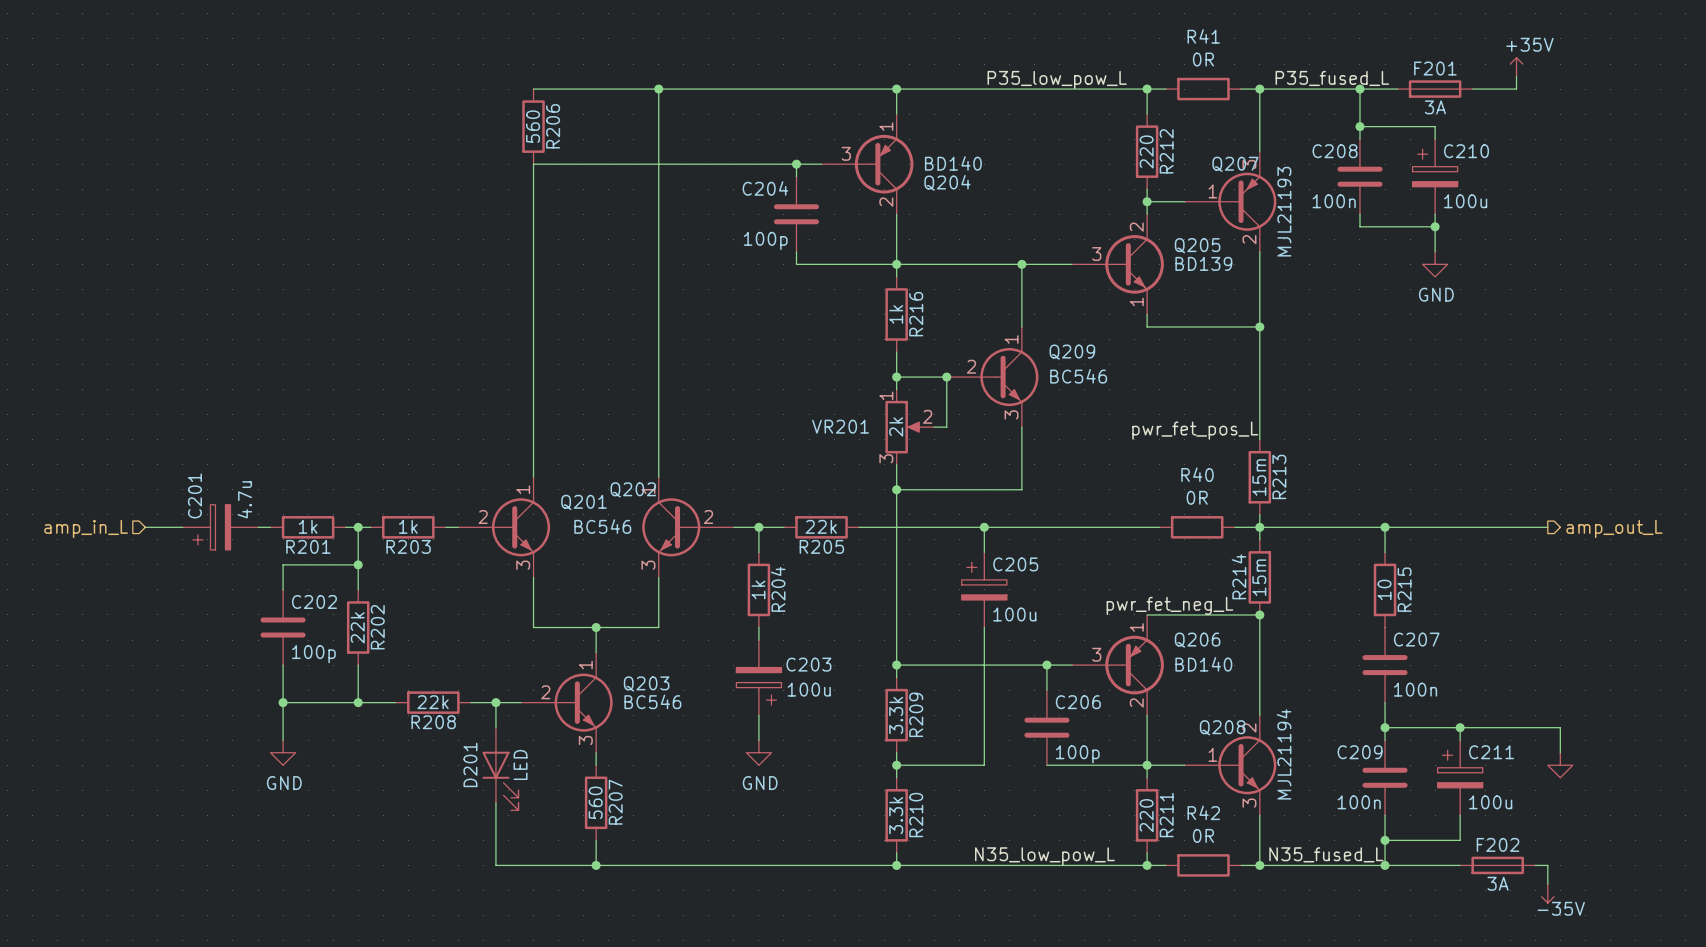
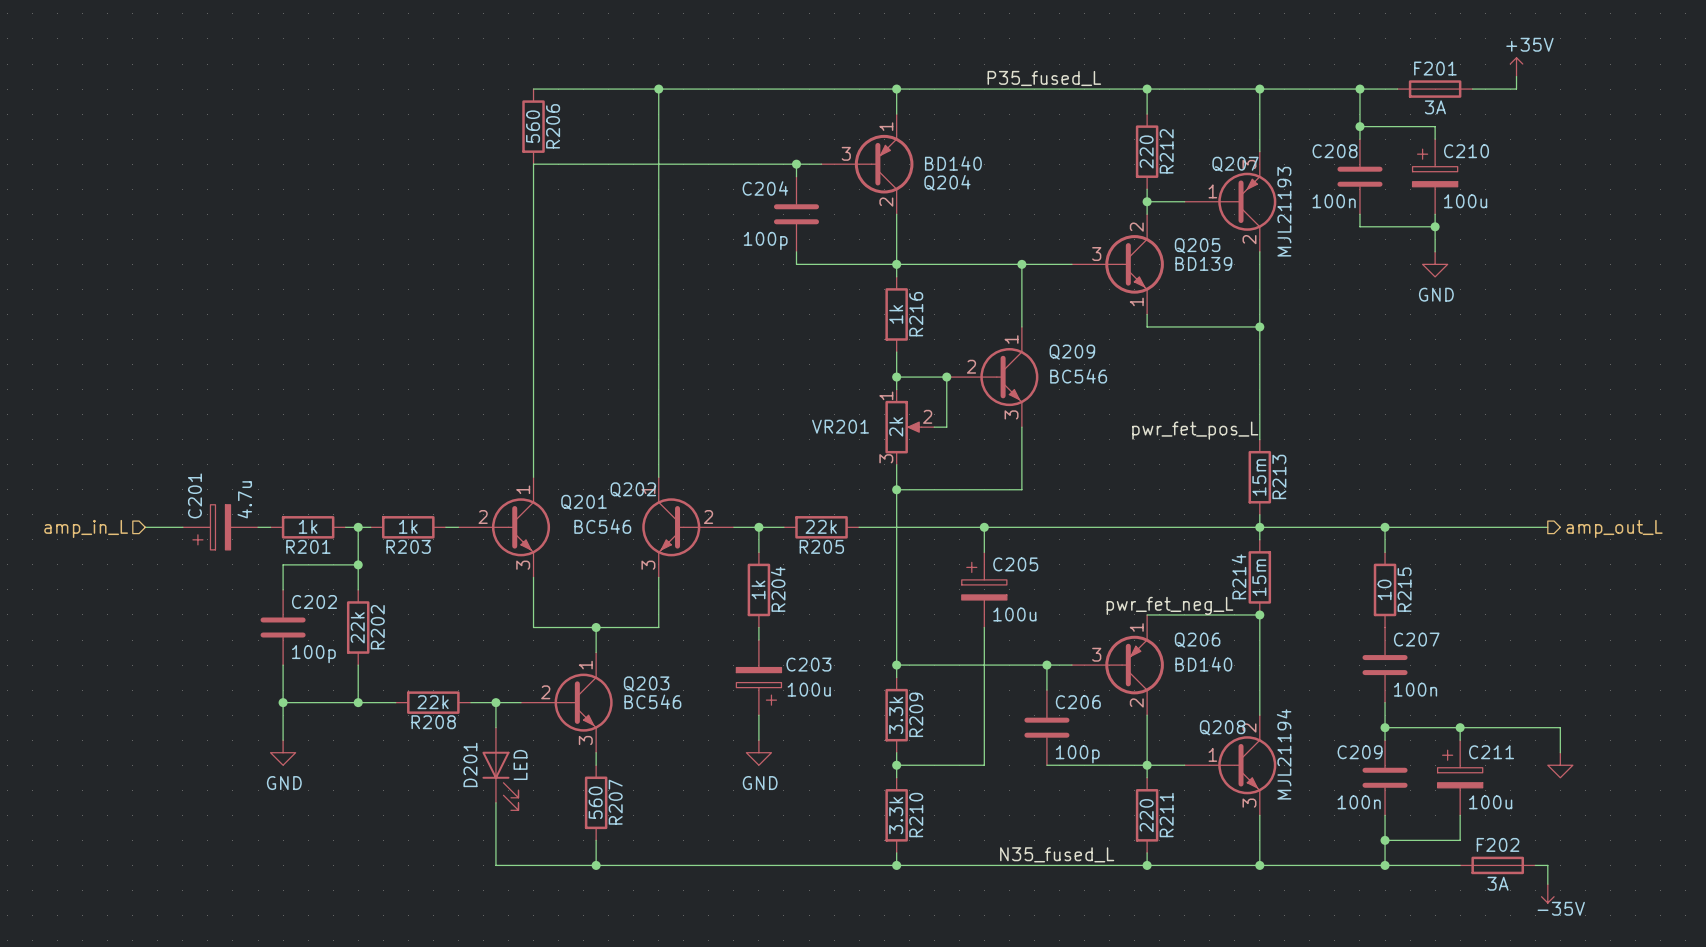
label: P35_fused_L (1332, 78) -> none
label: P35_low_pow_L (1057, 79) -> P35_fused_L (1044, 78)
wire: none -> (1165, 89) (1241, 89)
R41: 0R (1203, 89) -> none
wire: none -> (1159, 527) (1234, 527)
R40: 0R (1197, 527) -> none
label: none -> N35_fused_L (1057, 854)
label: N35_fused_L (1326, 854) -> none
label: N35_low_pow_L (1044, 856) -> none
wire: none -> (1165, 865) (1241, 865)
R42: 0R (1203, 865) -> none

